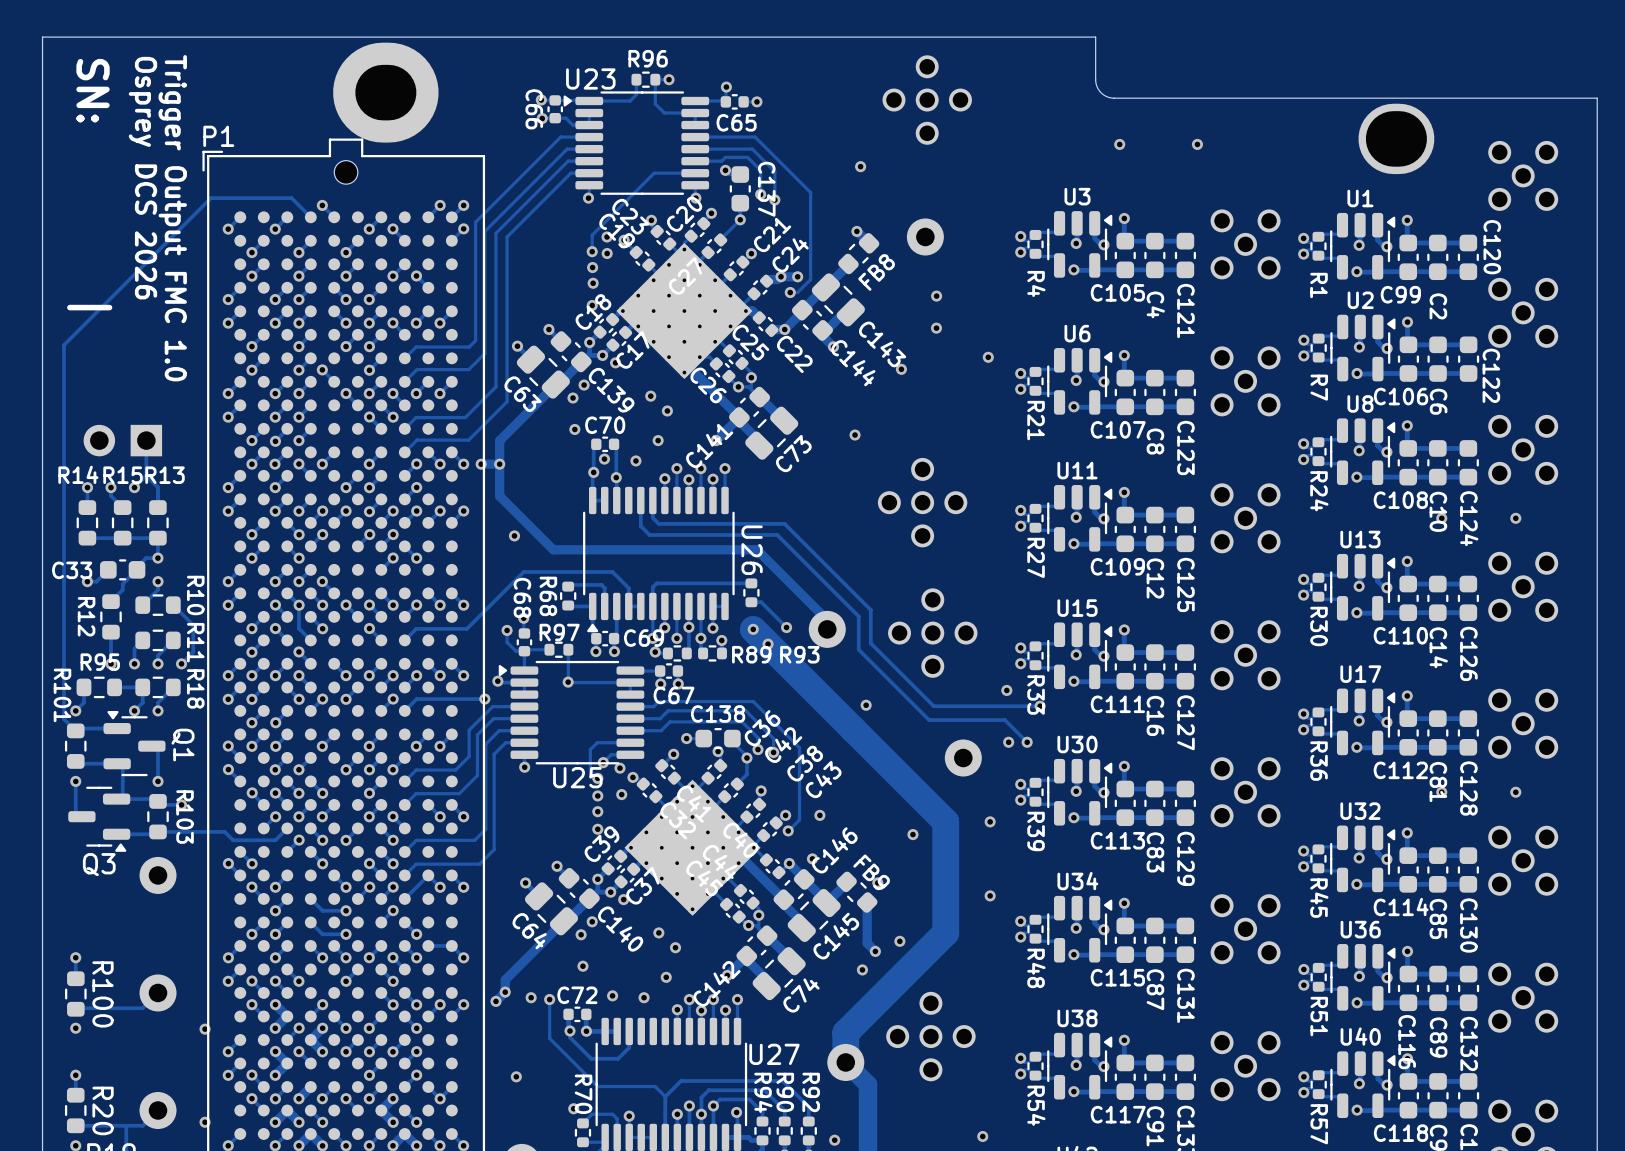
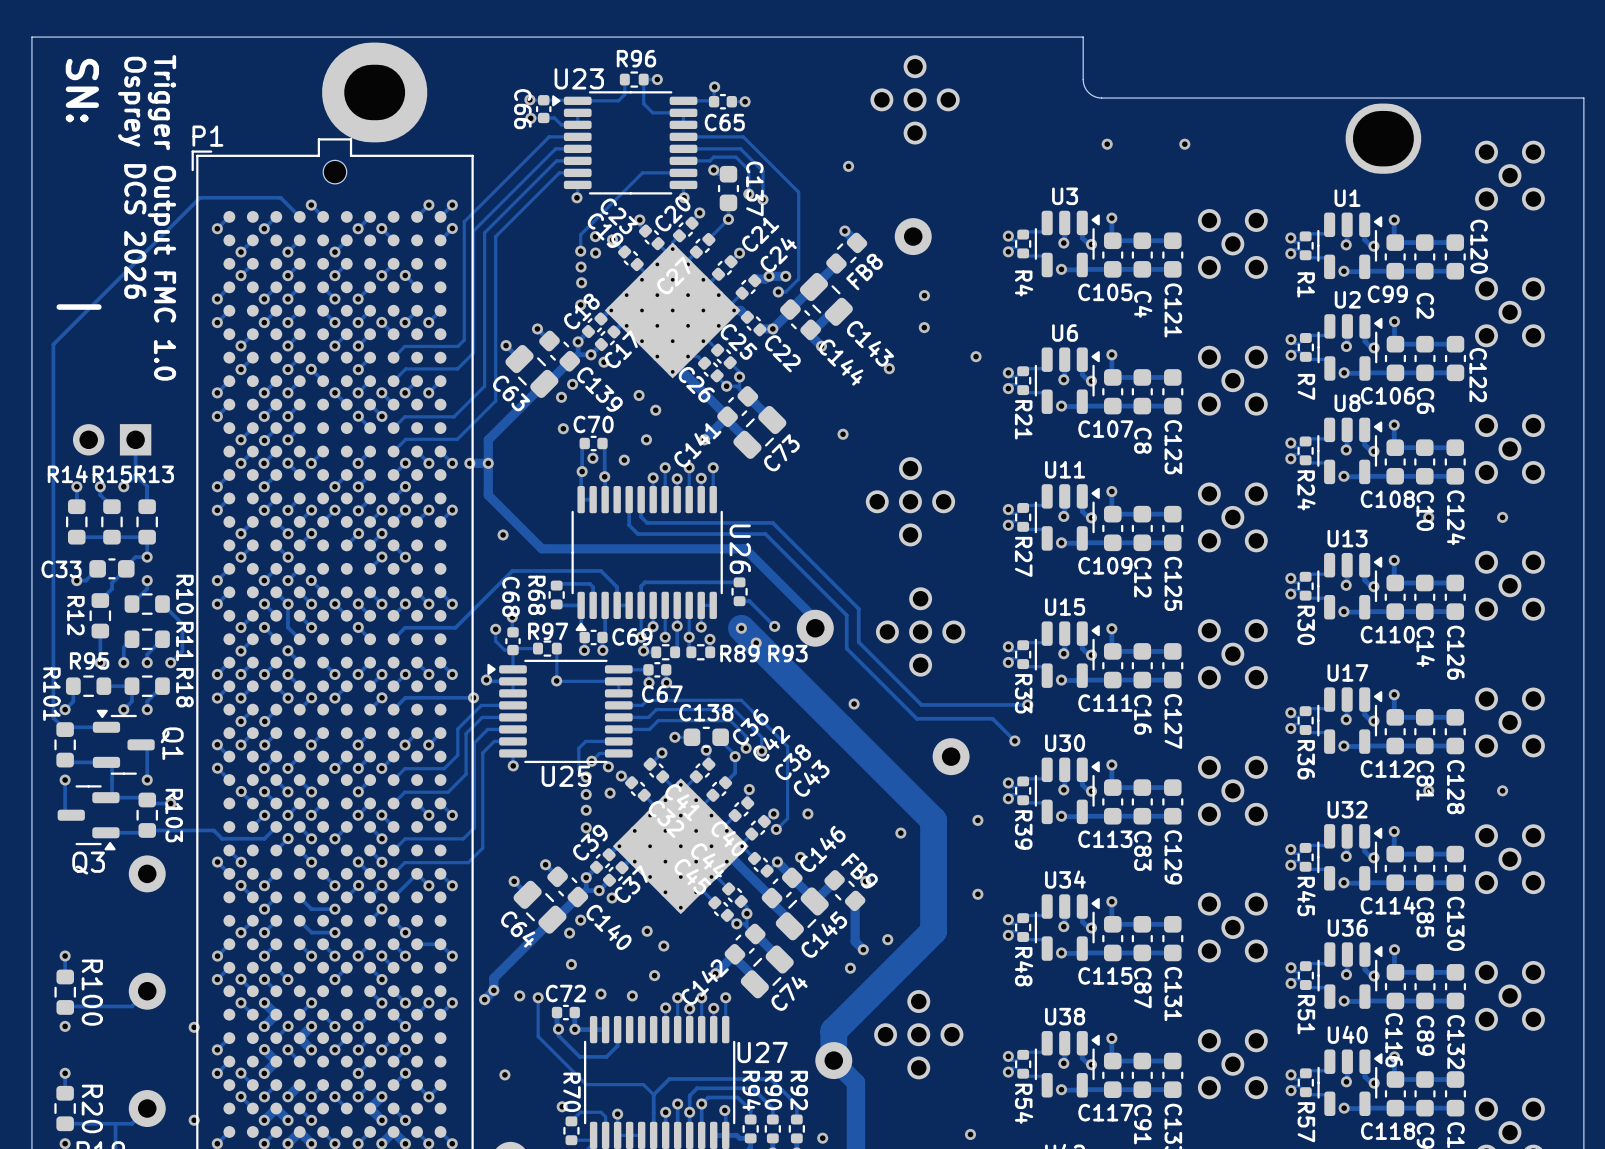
via: (1006, 690) -> none
via: (1008, 742) -> none

